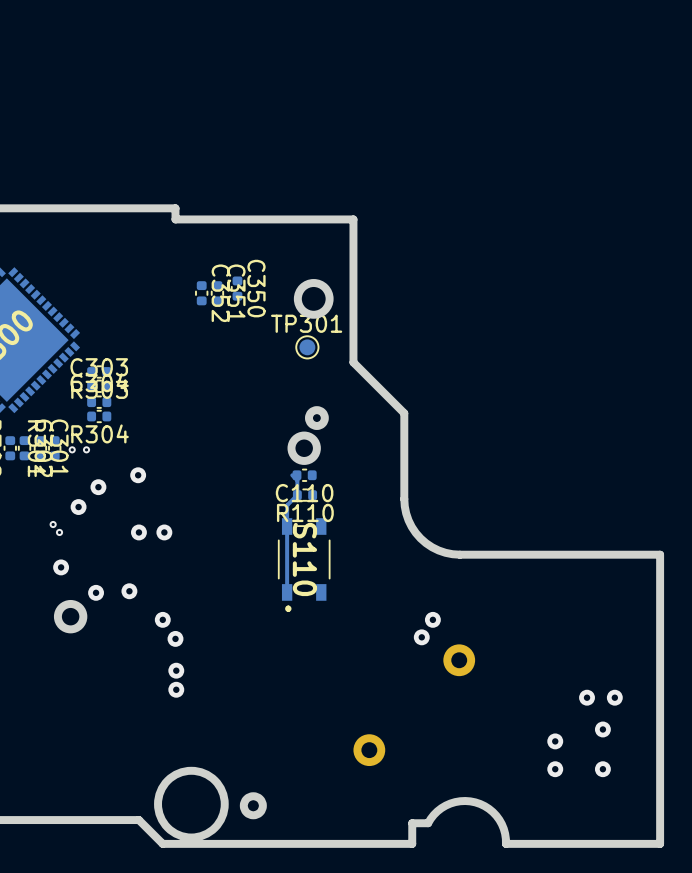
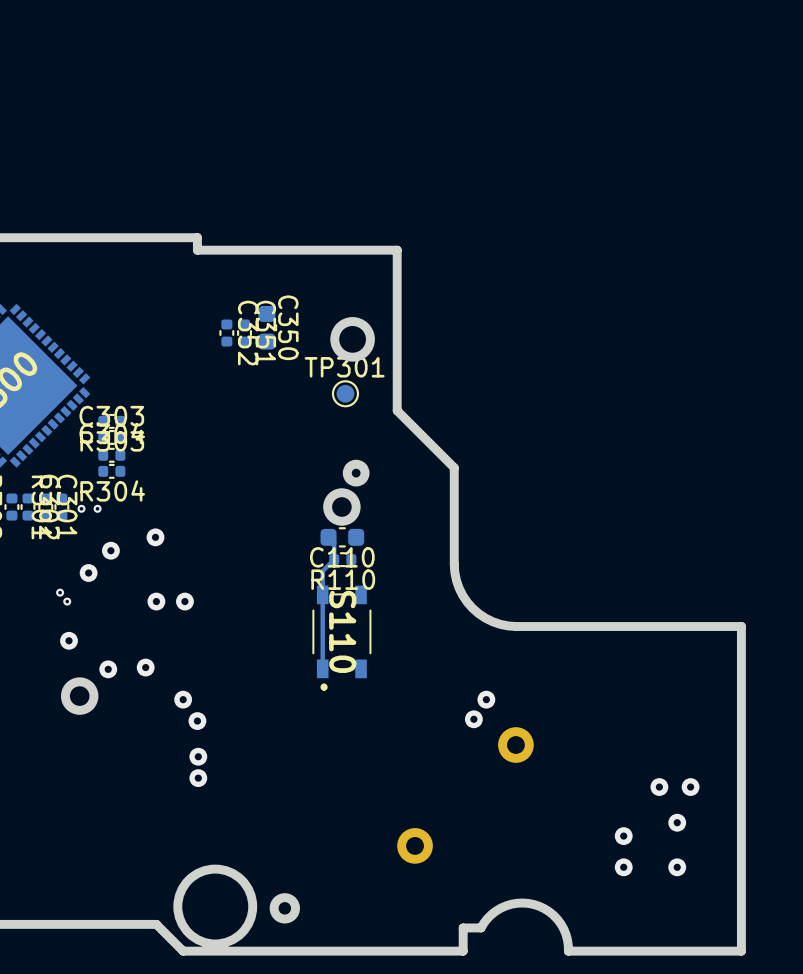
C350 footprint: [230, 276, 245, 301] -> [256, 305, 278, 350]
C110 footprint: [292, 468, 317, 482] -> [320, 527, 365, 548]

